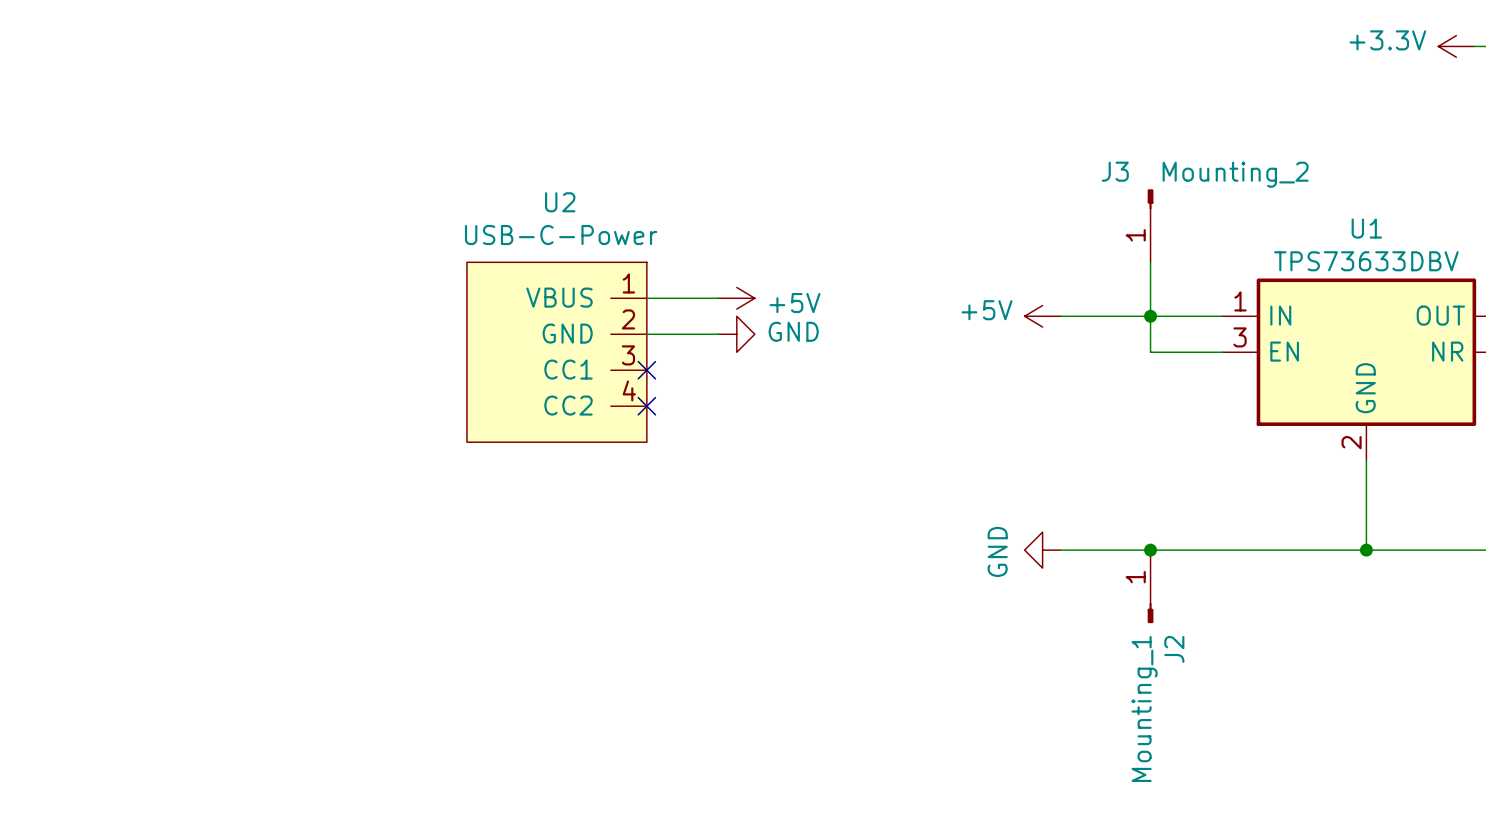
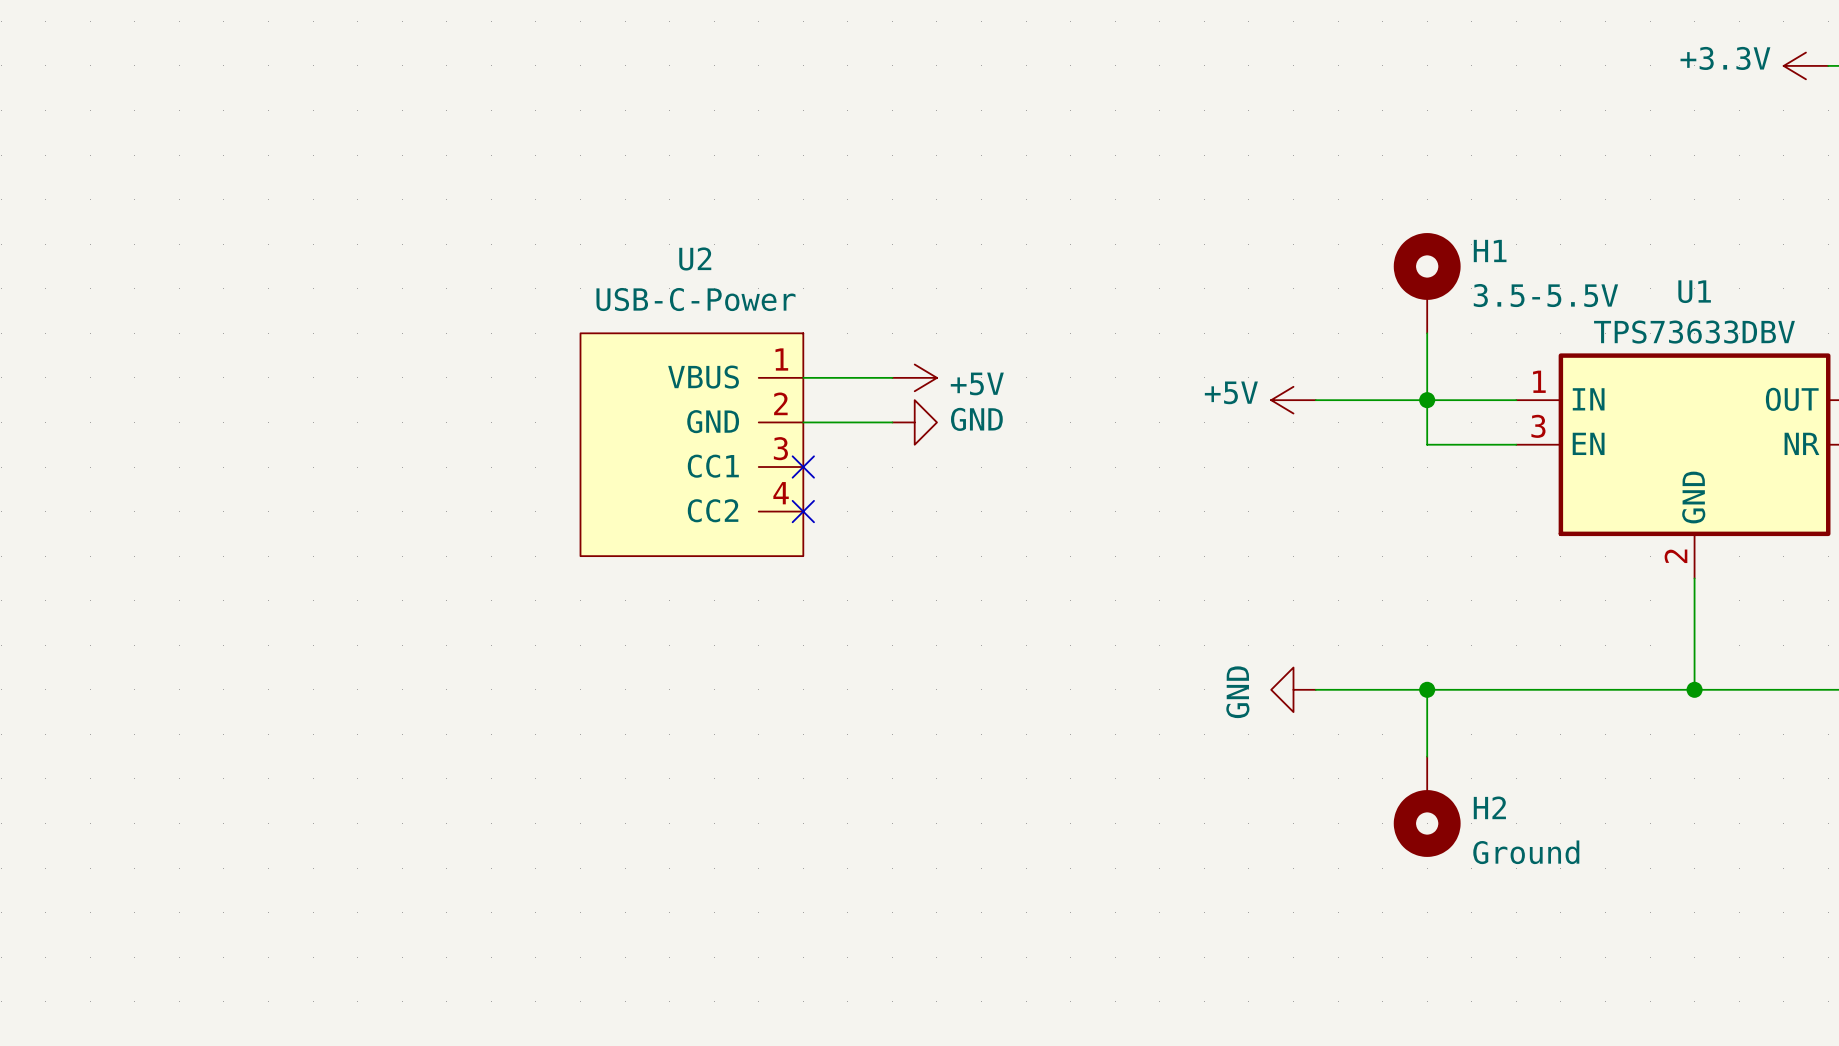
H1: none -> 3.5-5.5V (1427, 283)
J3: Mounting_2 (1150, 225) -> none
J2: Mounting_1 (1150, 586) -> none
H2: none -> Ground (1427, 806)

